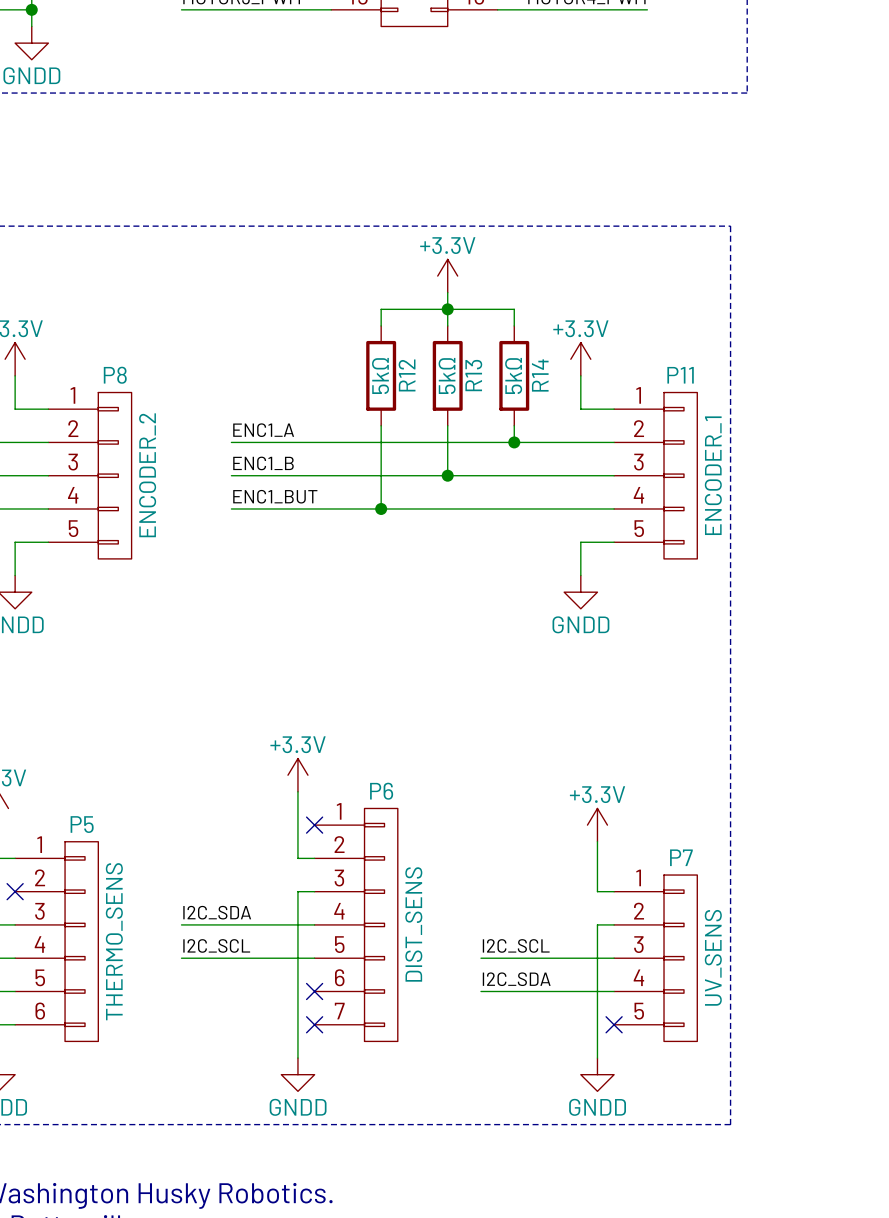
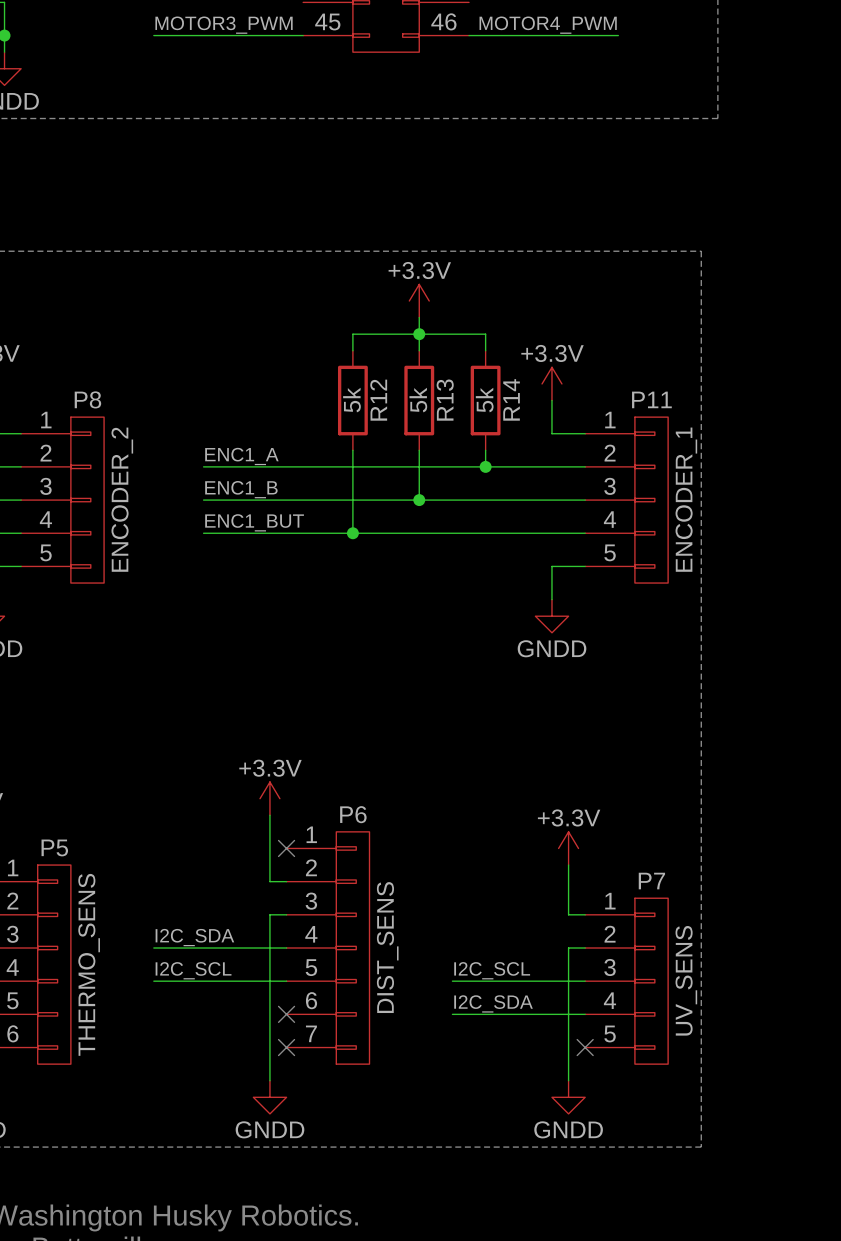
R12 value: 5kΩ (380, 375) -> 5k (351, 400)
R13 value: 5kΩ (447, 375) -> 5k (418, 400)
R14 value: 5kΩ (513, 375) -> 5k (484, 400)

